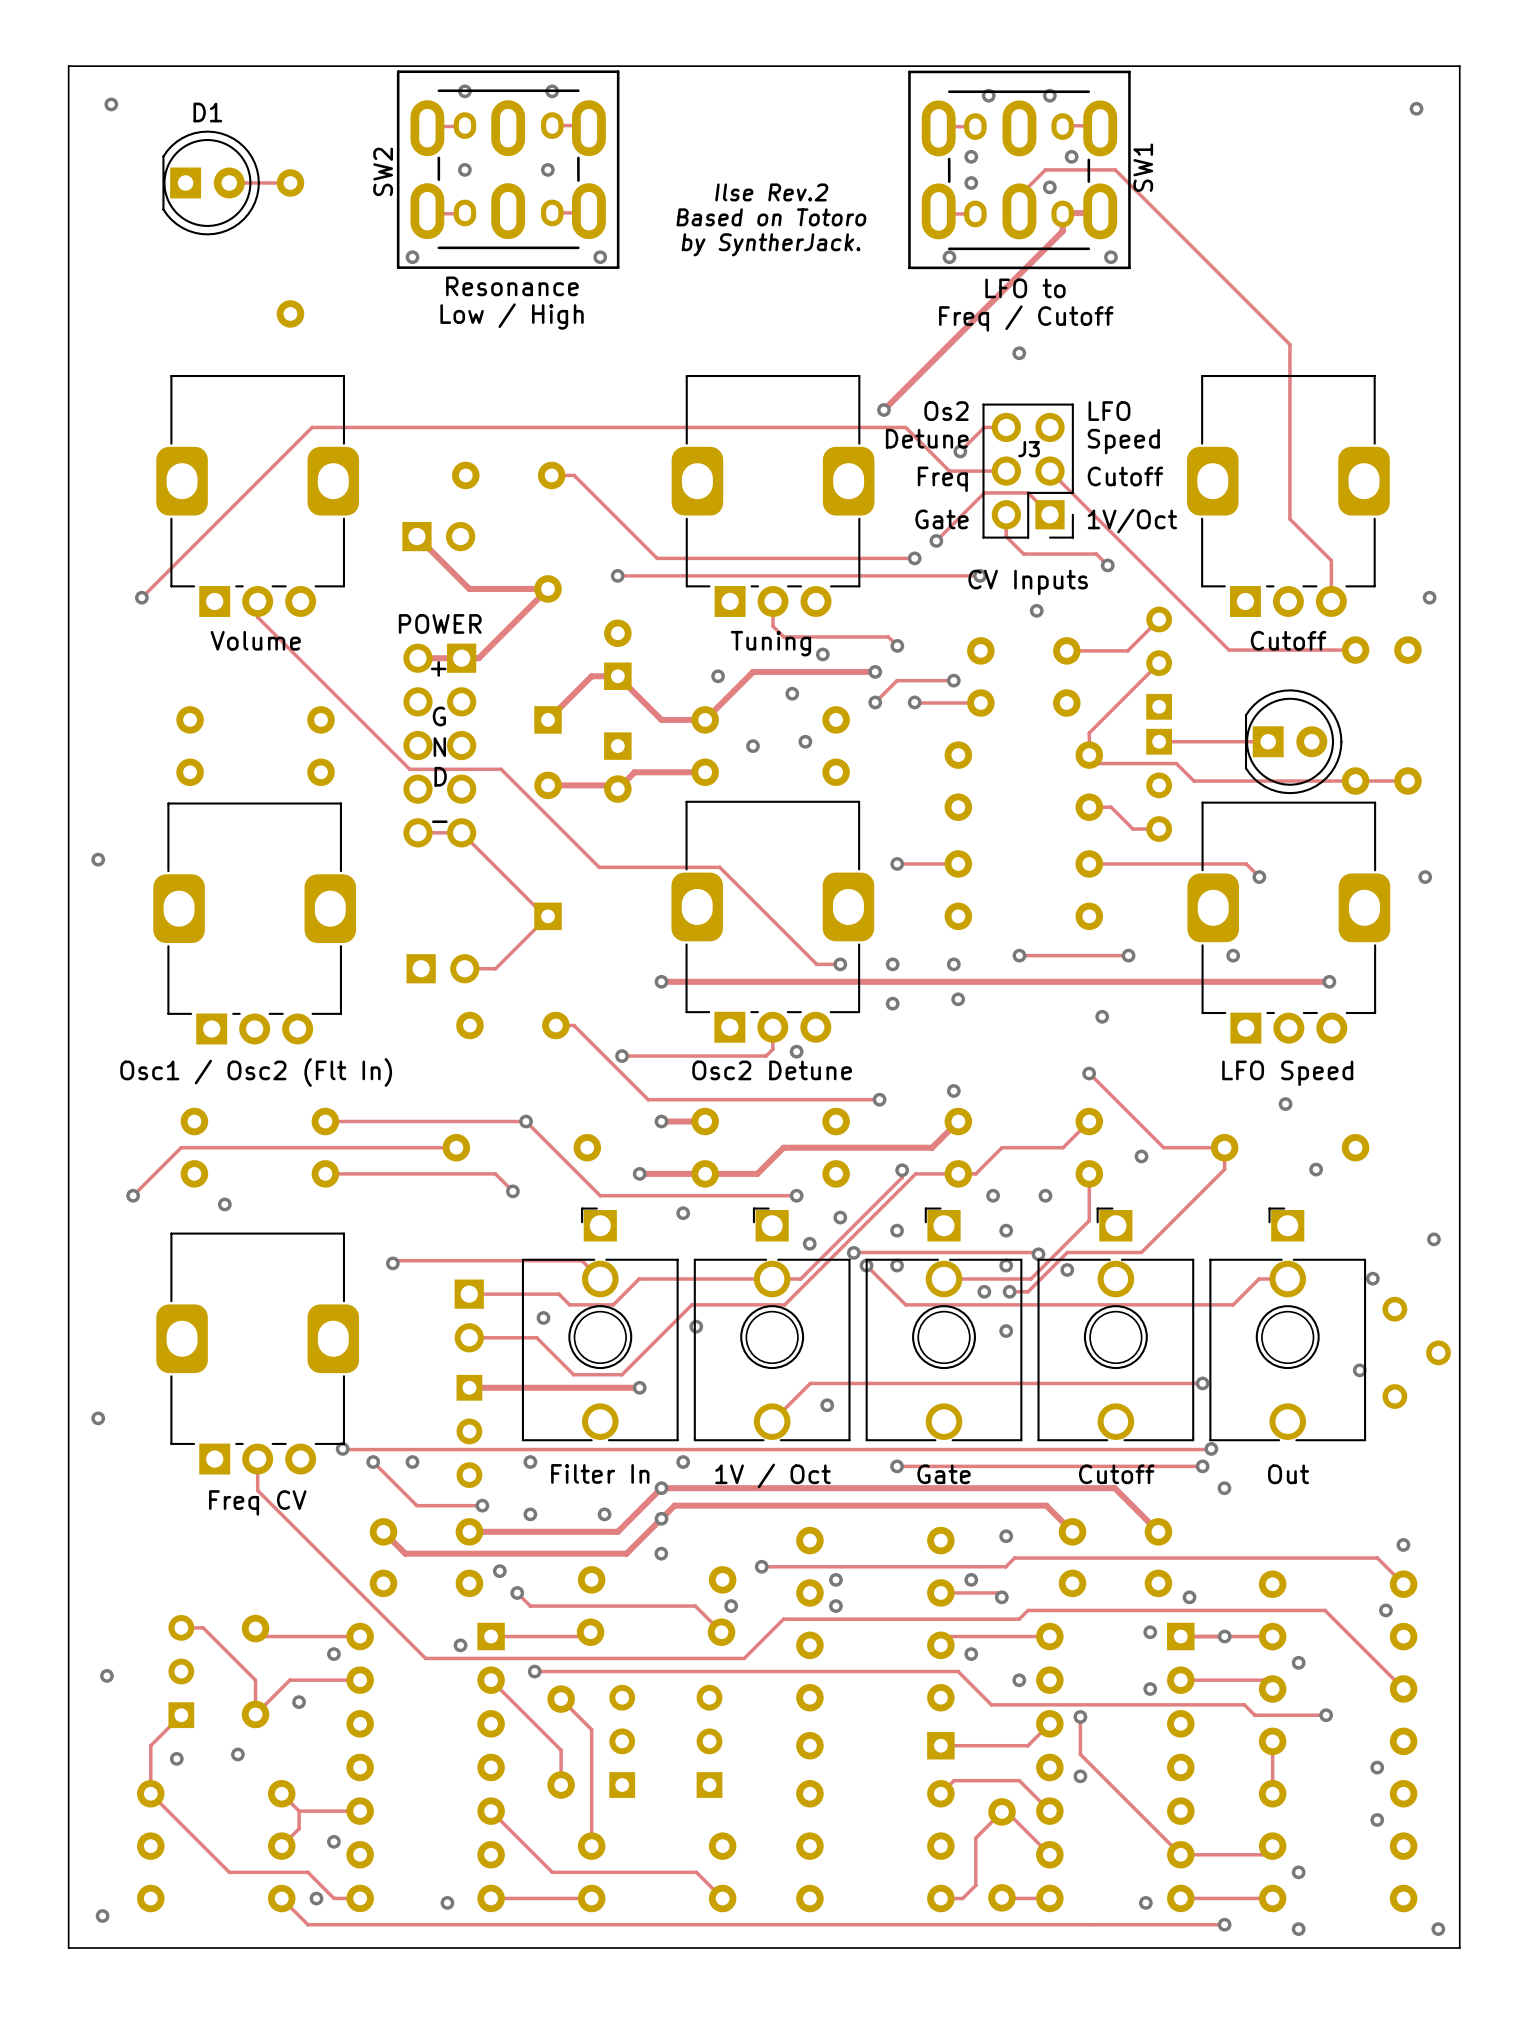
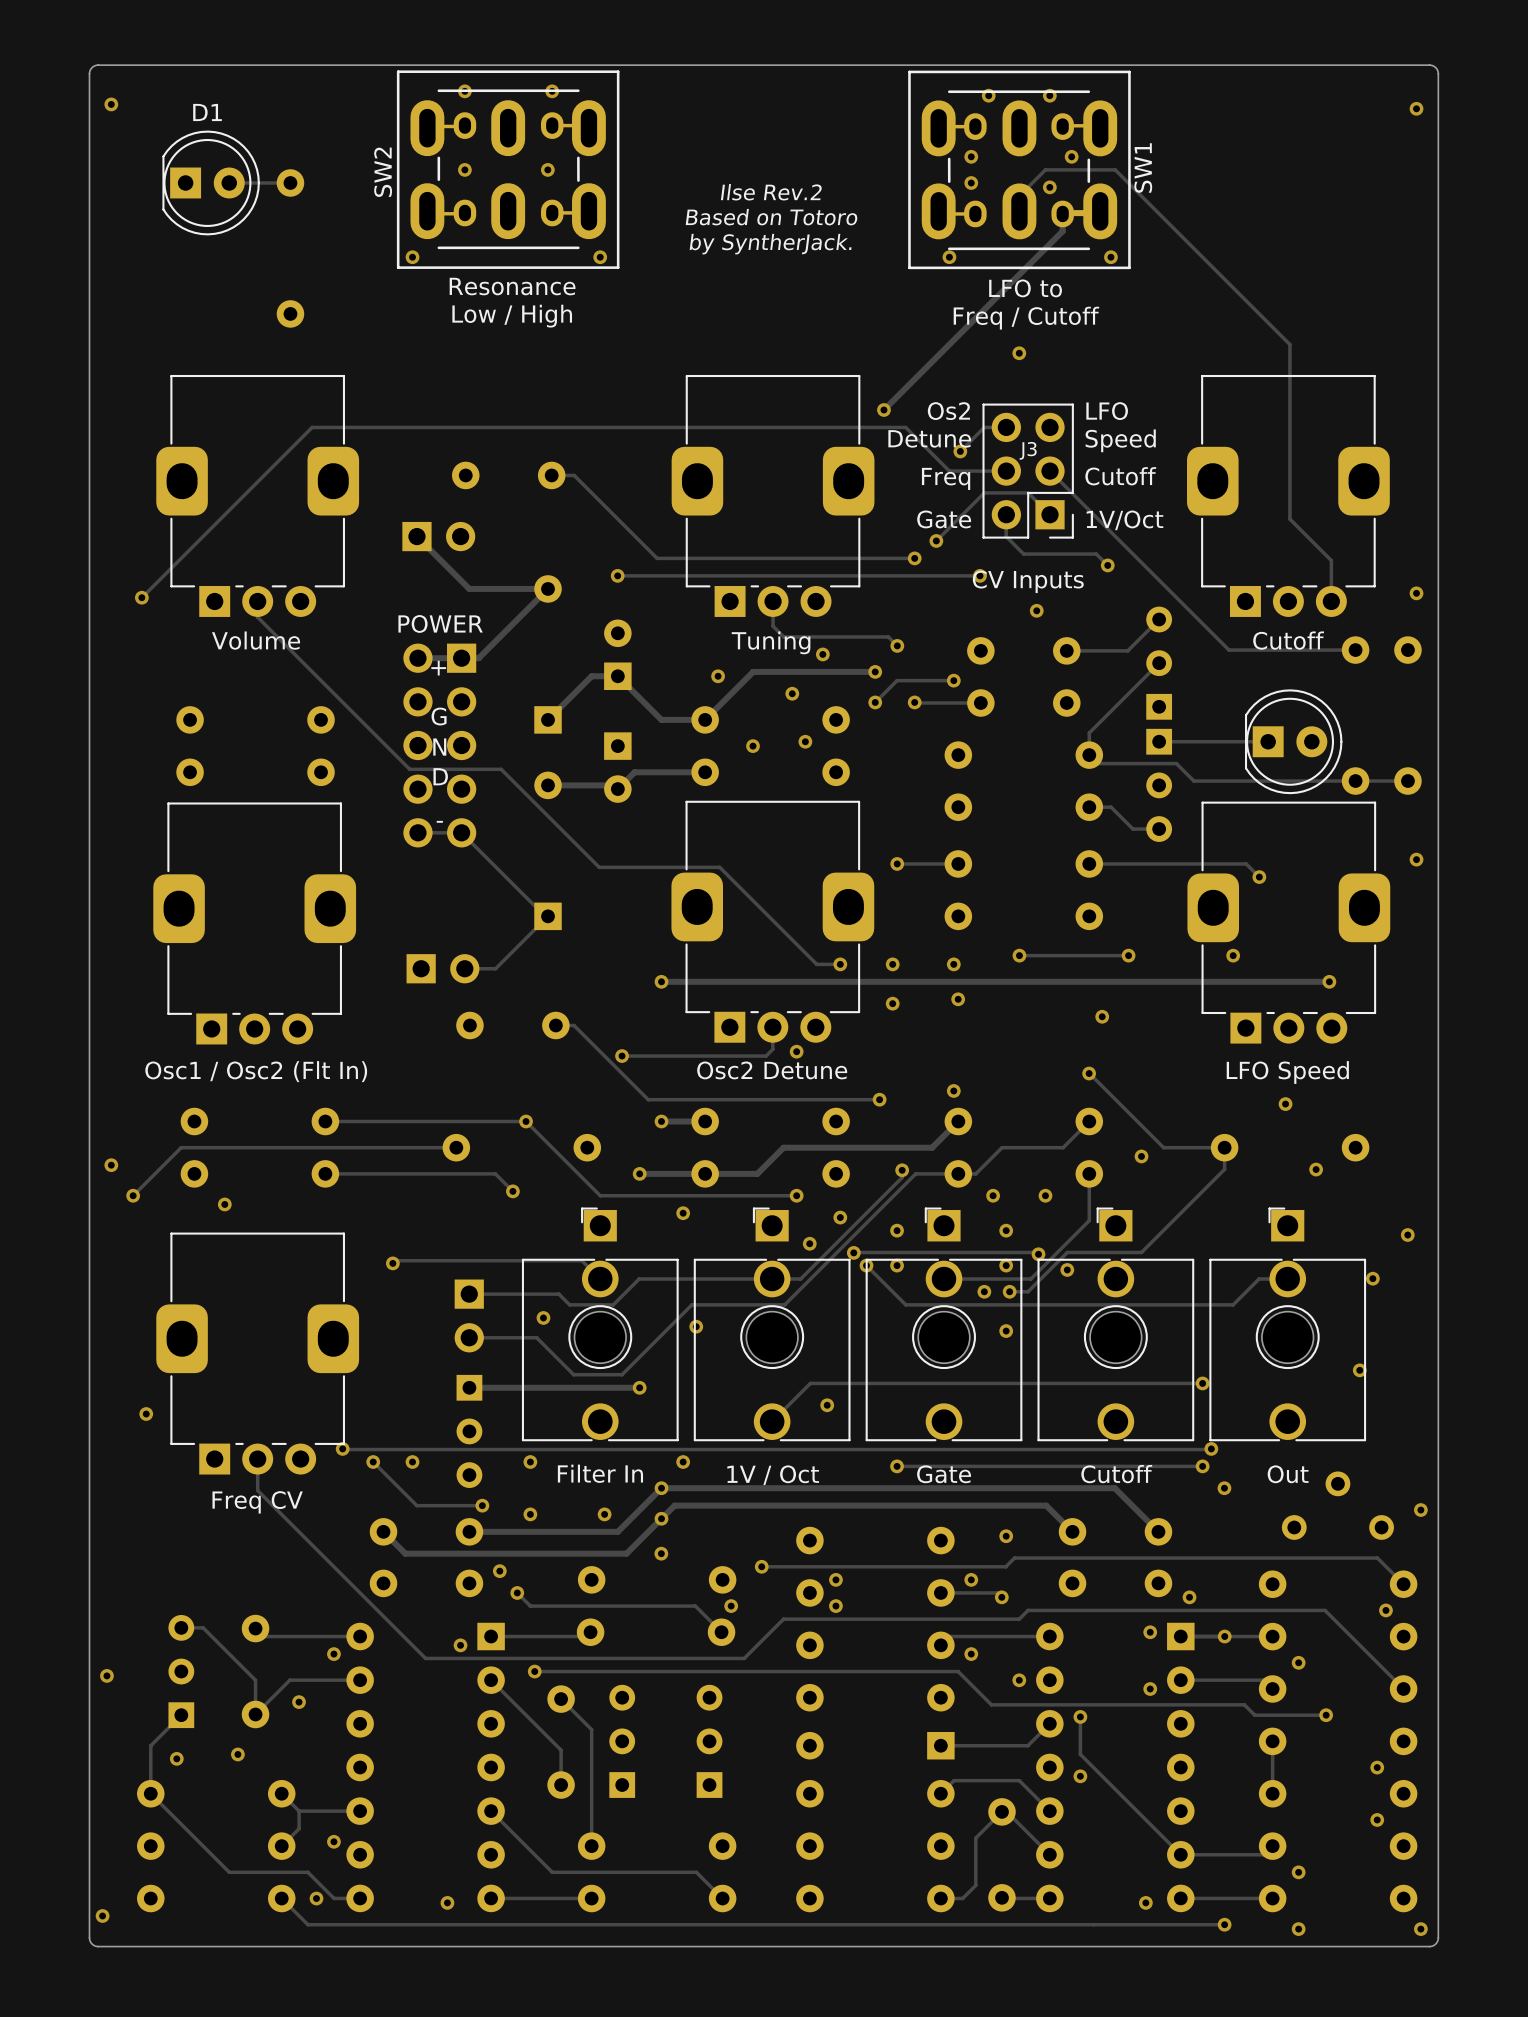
board edge: (68, 66) (68, 1947) (1459, 1947) (1459, 66) (68, 66) -> (98, 65) (92, 67) (89, 73) (89, 1937) (91, 1943) (98, 1946) (1429, 1946) (1434, 1944) (1438, 1937) (1438, 73) (1436, 68) (1429, 65) (98, 65)
via position: (1429, 597) -> (1416, 593)
via: (98, 859) -> none
via position: (1425, 877) -> (1416, 859)
via: none -> (111, 1165)
via position: (1433, 1239) -> (1407, 1235)
part rotation: 0° (1416, 1352) -> 90° counterclockwise (1337, 1505)
part position: (1416, 1352) -> (1337, 1505)
via position: (98, 1418) -> (146, 1414)
via position: (1403, 1544) -> (1420, 1510)
via position: (1438, 1929) -> (1420, 1929)

